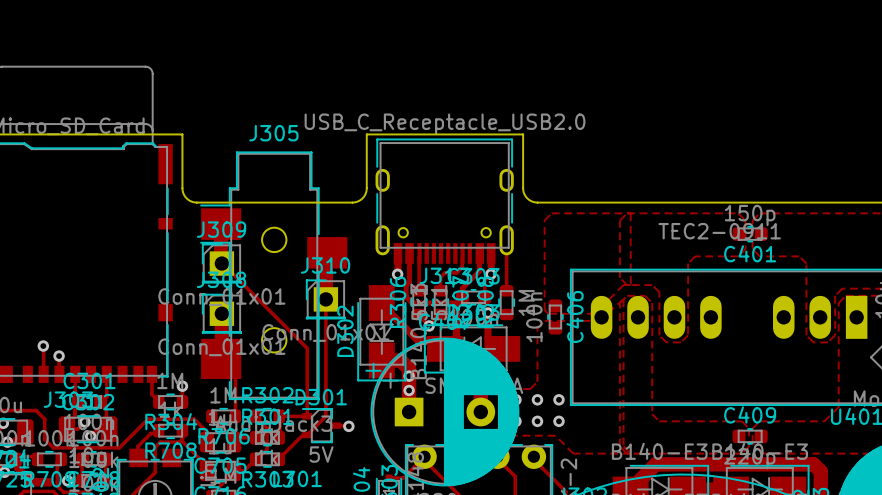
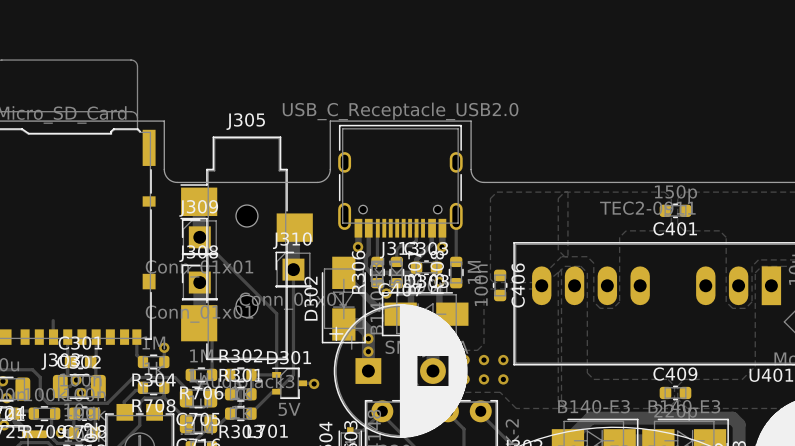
track: (43, 346) (43, 374) -> none
via: (43, 346) -> none
via: (59, 356) -> none

